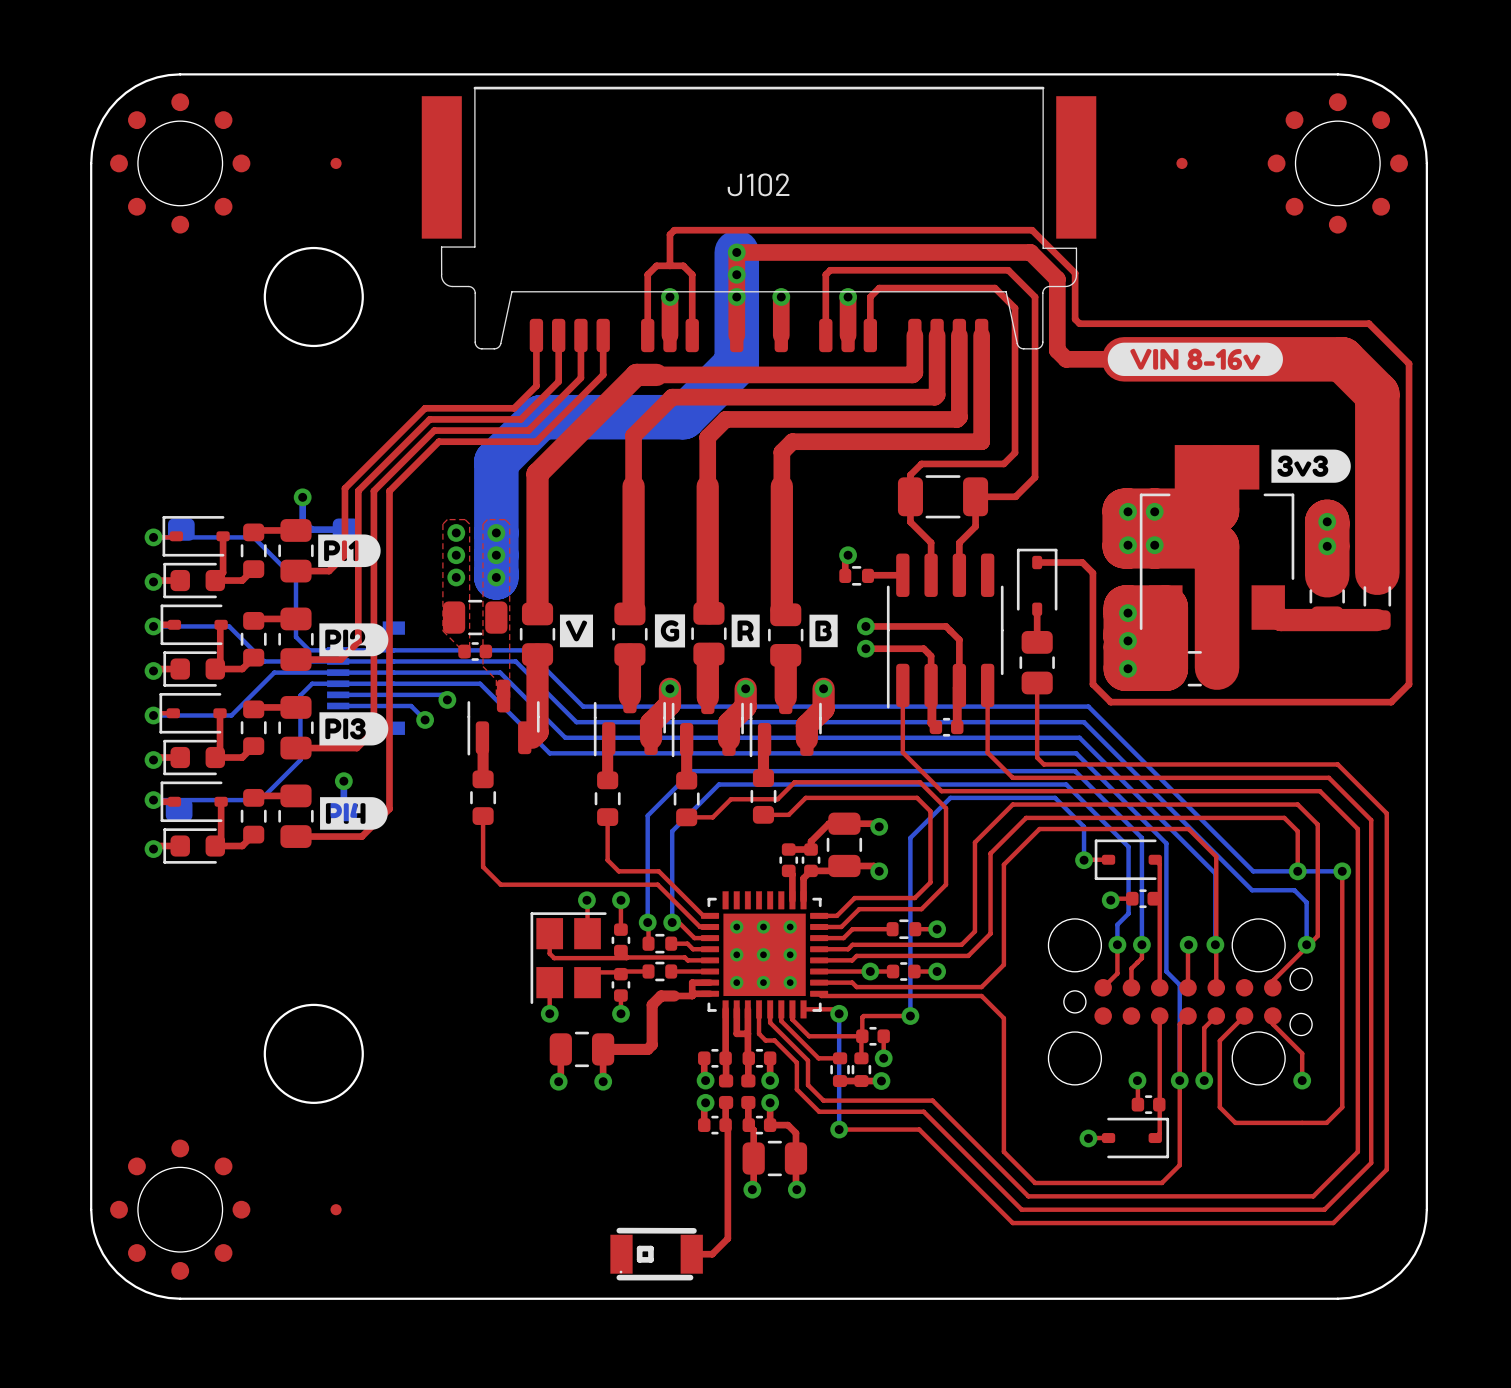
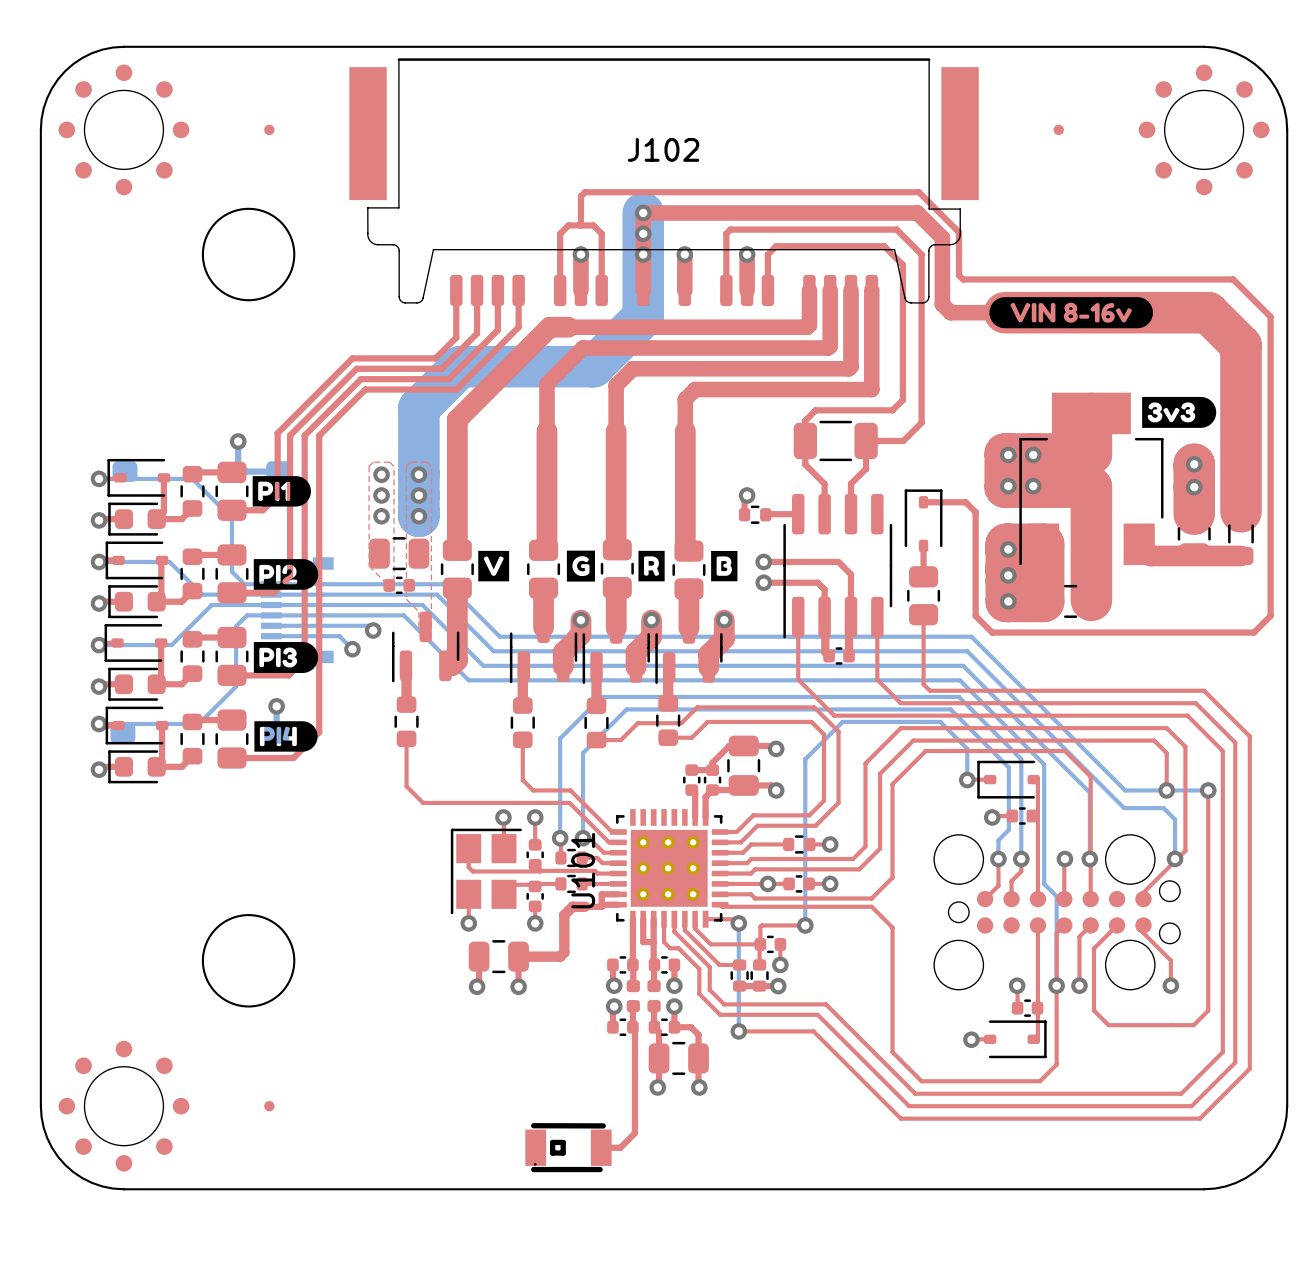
U101 name: none -> U101 (583, 870)

